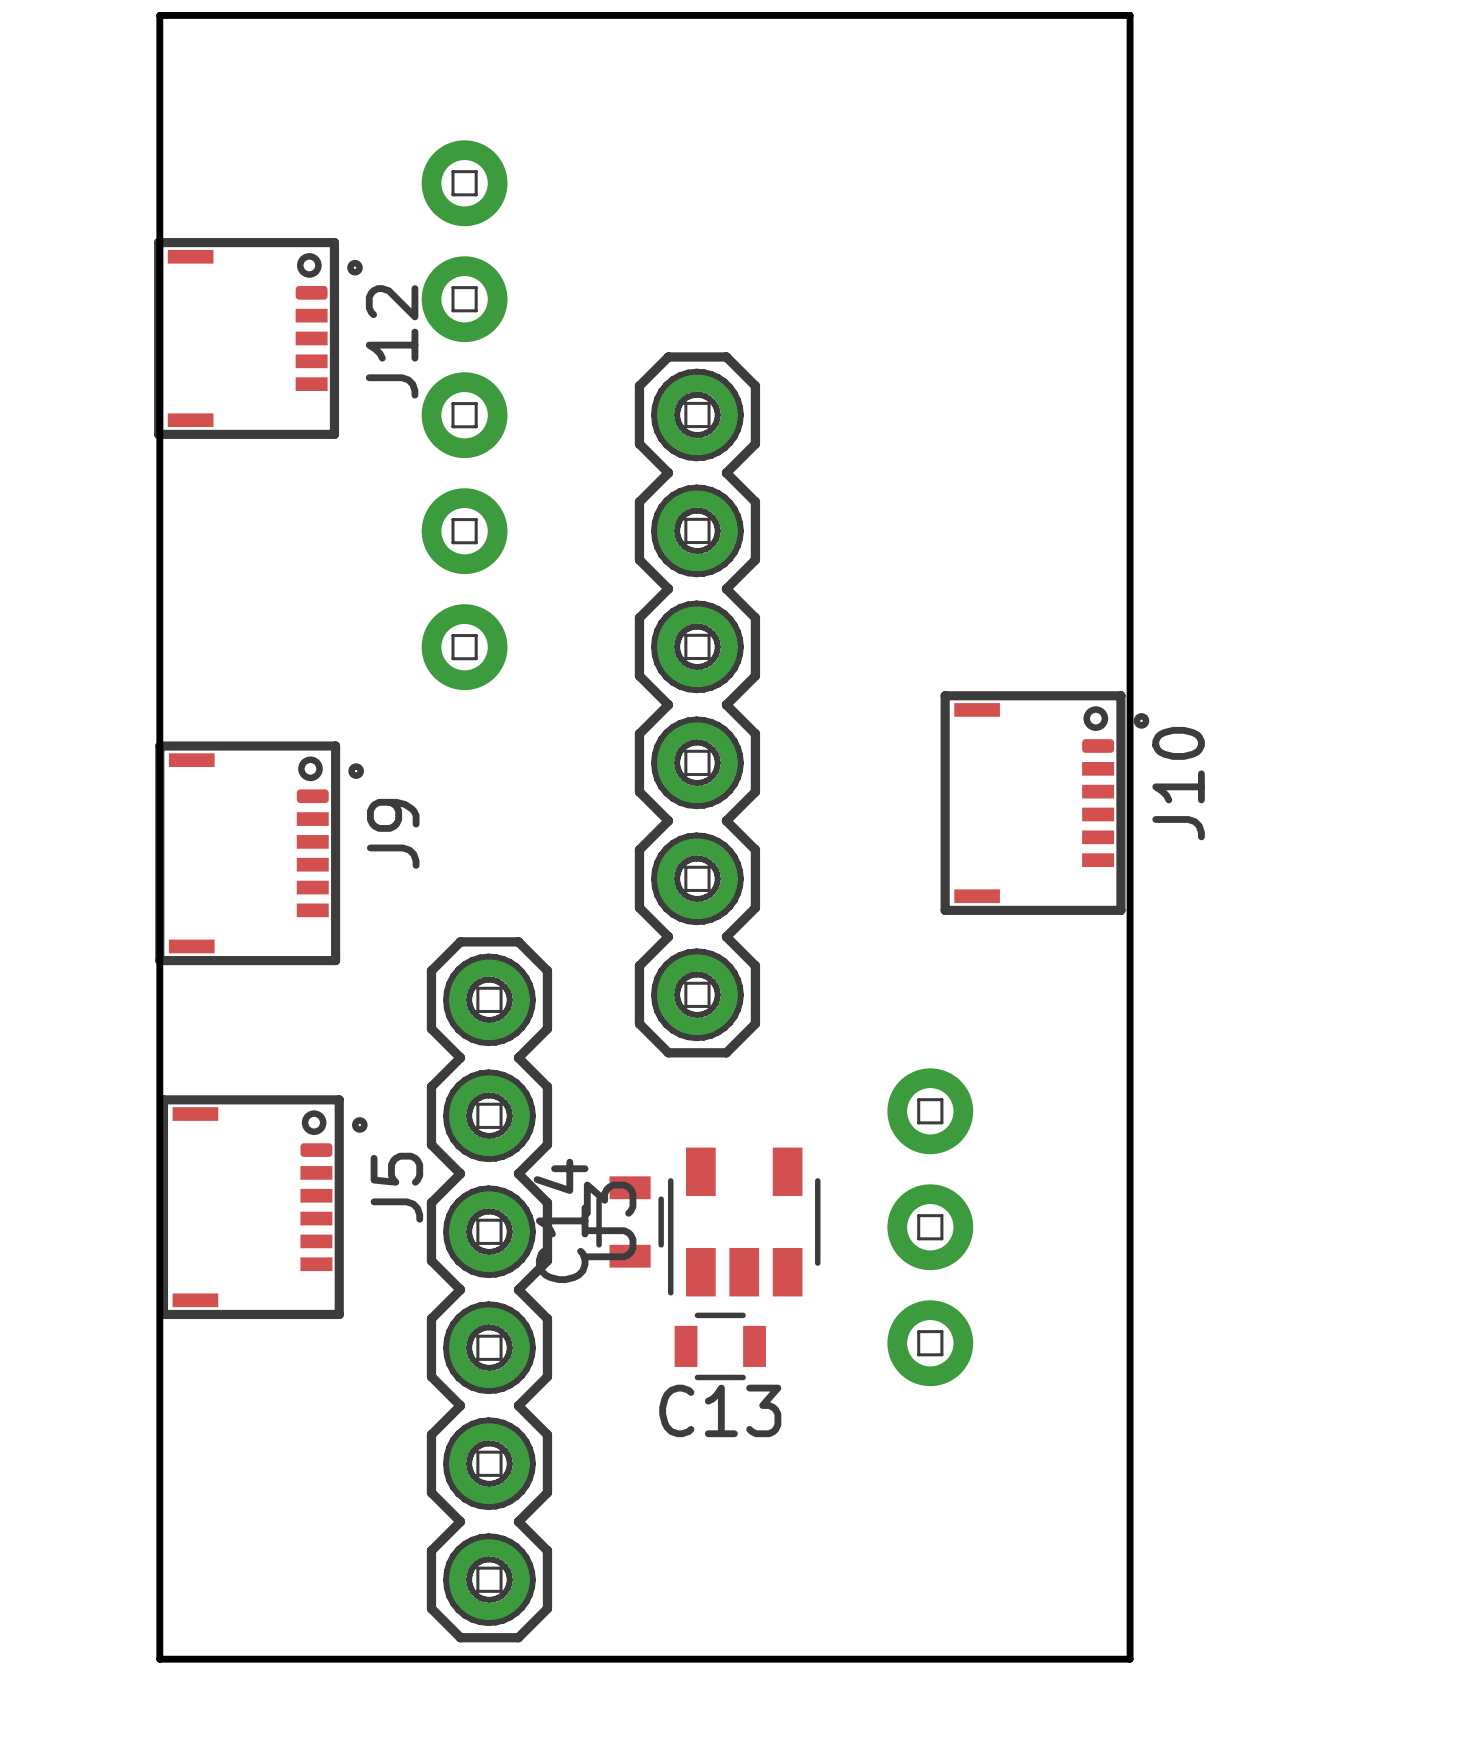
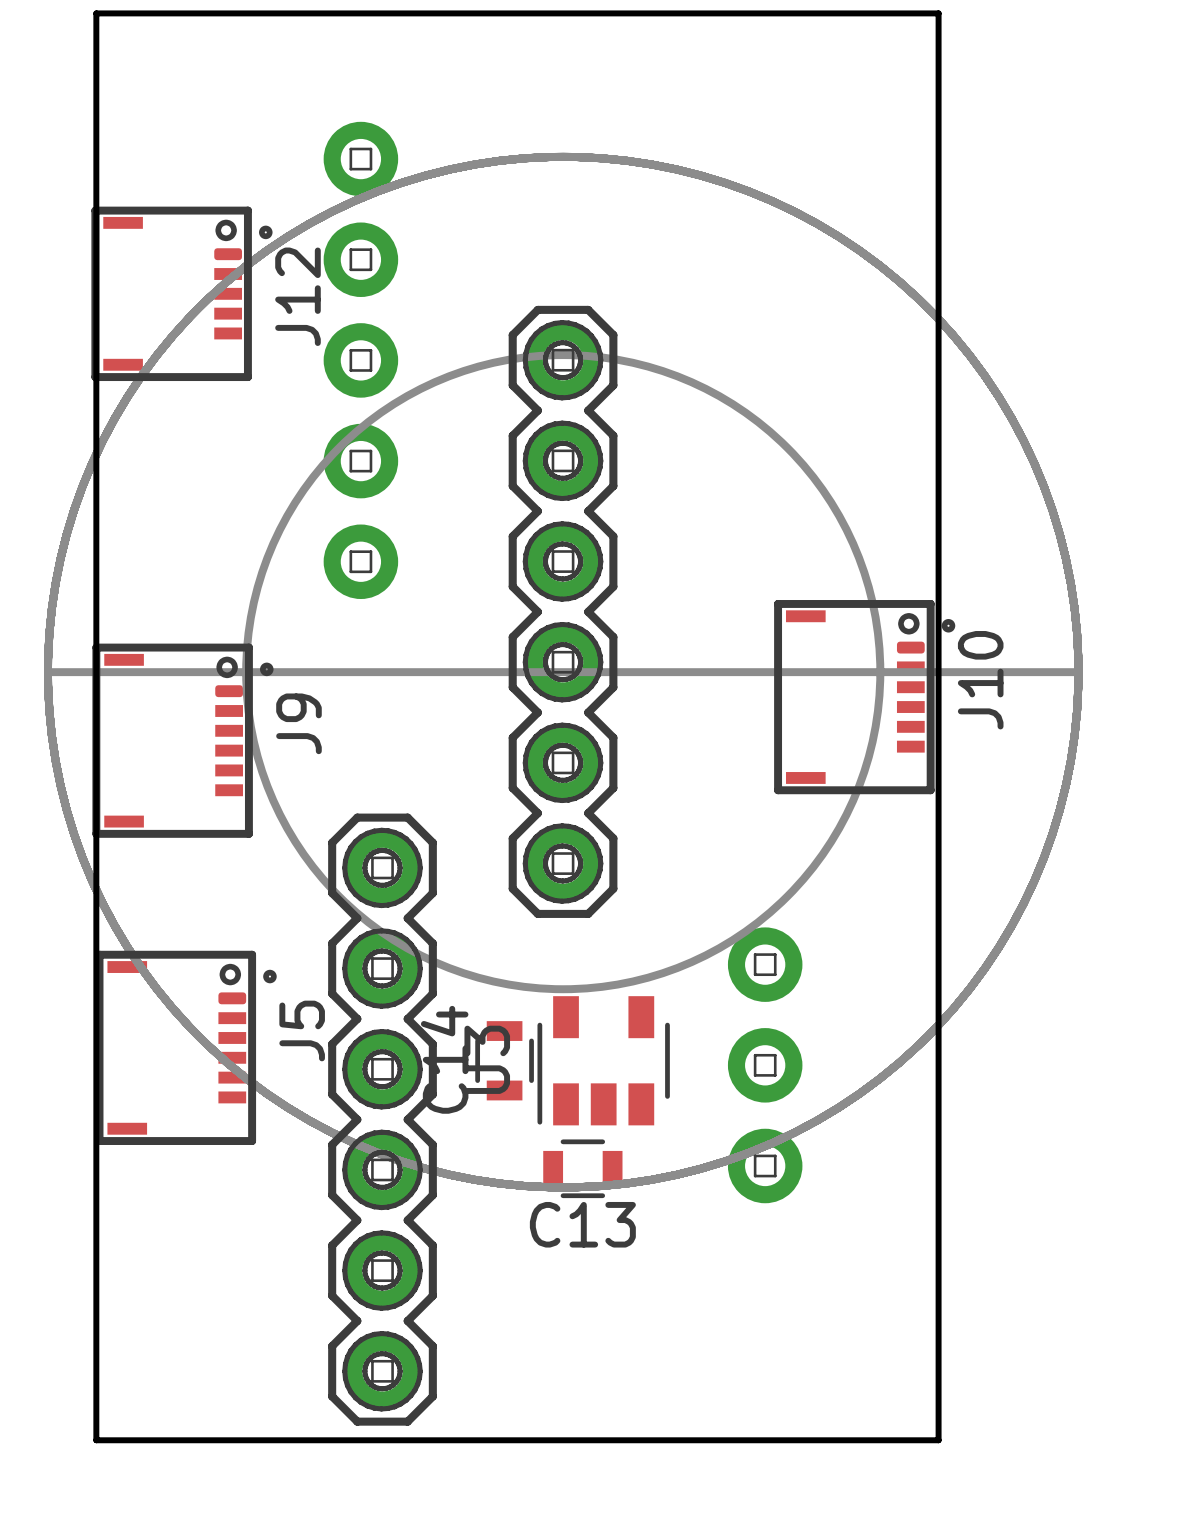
drawing: none -> [44, 152, 1083, 1192]
line: none -> (47, 672) (1078, 672)

